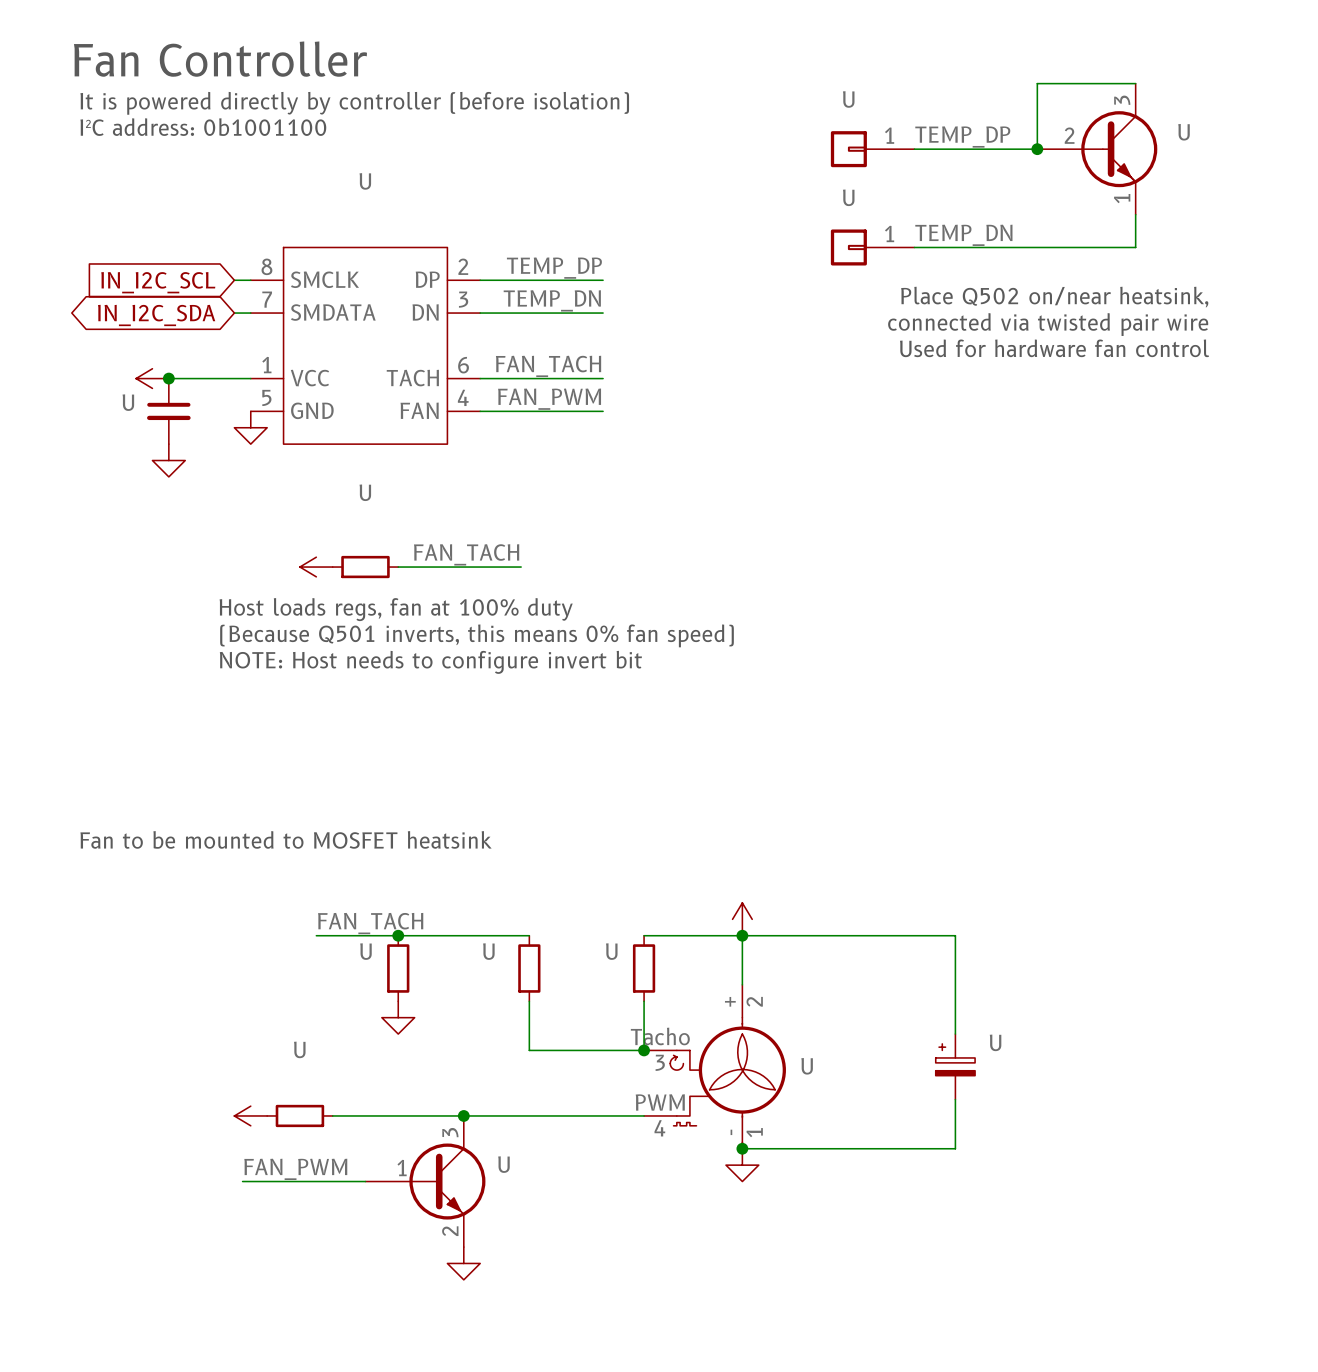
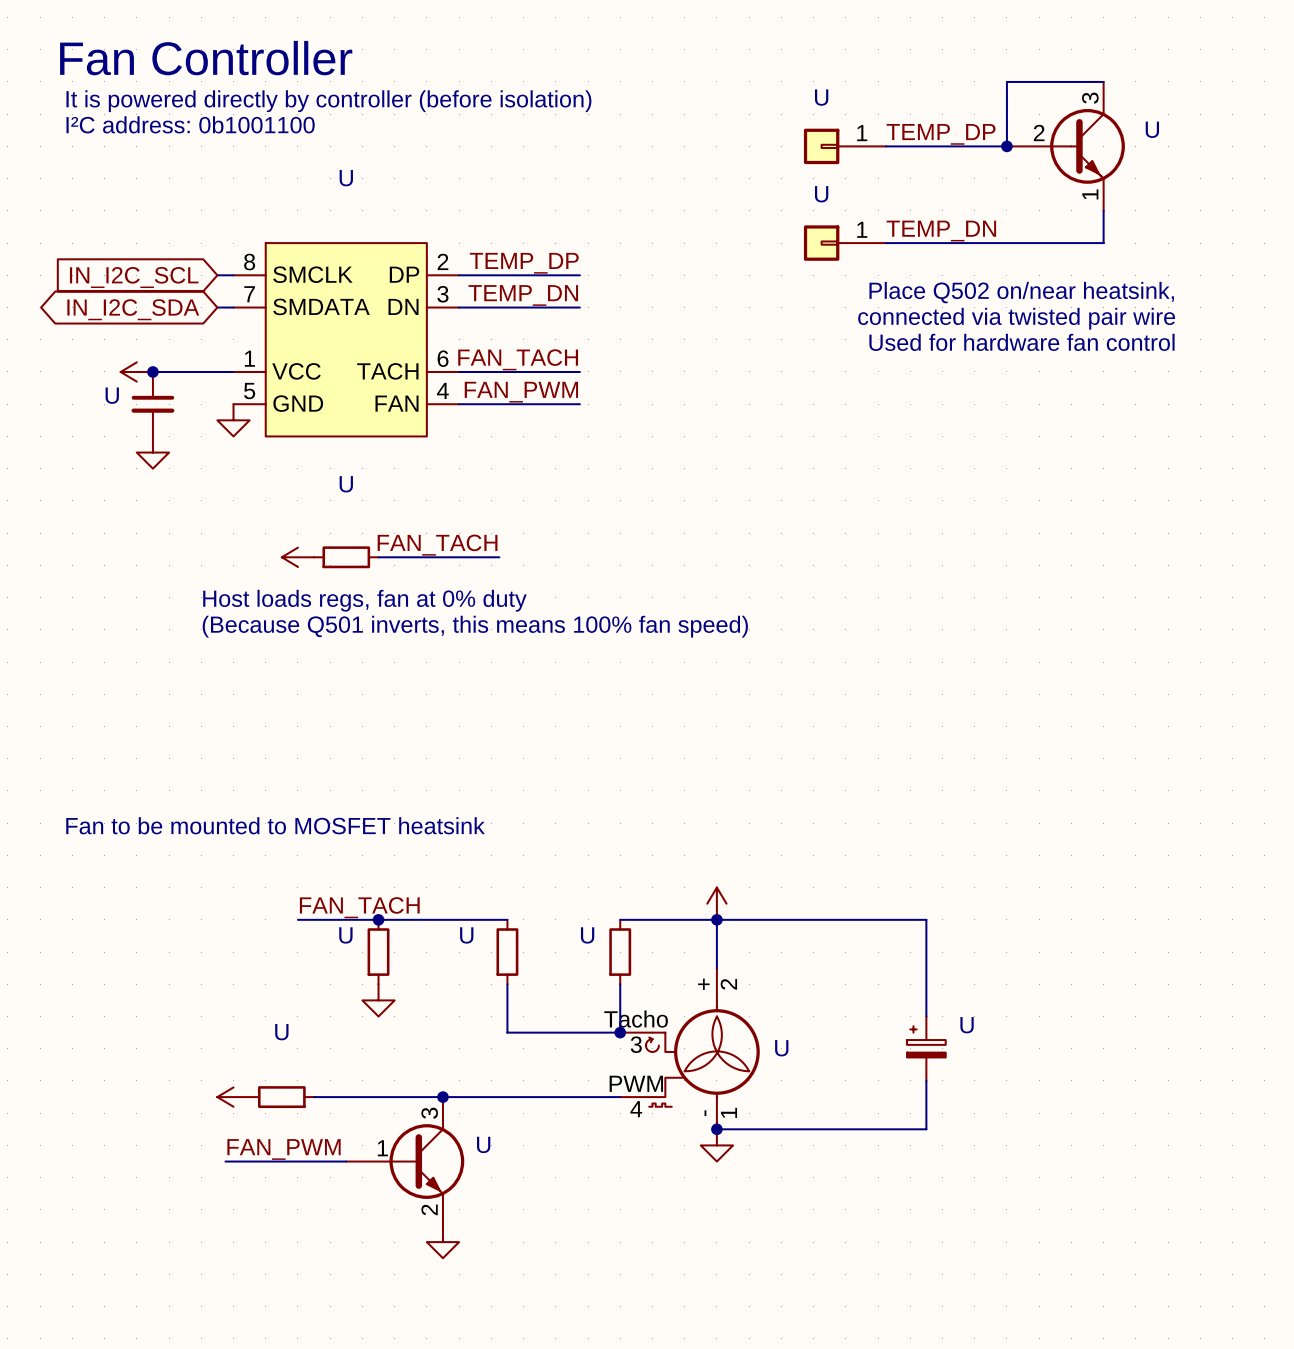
text: Host loads regs, fan at 100% duty (396, 609) -> Host loads regs, fan at 0% duty (364, 600)
text: (Because Q501 inverts, this means 0% fan speed) (477, 635) -> (Because Q501 inverts, this means 100% fan speed) (475, 626)
text: NOTE: Host needs to configure invert bit (430, 662) -> none

